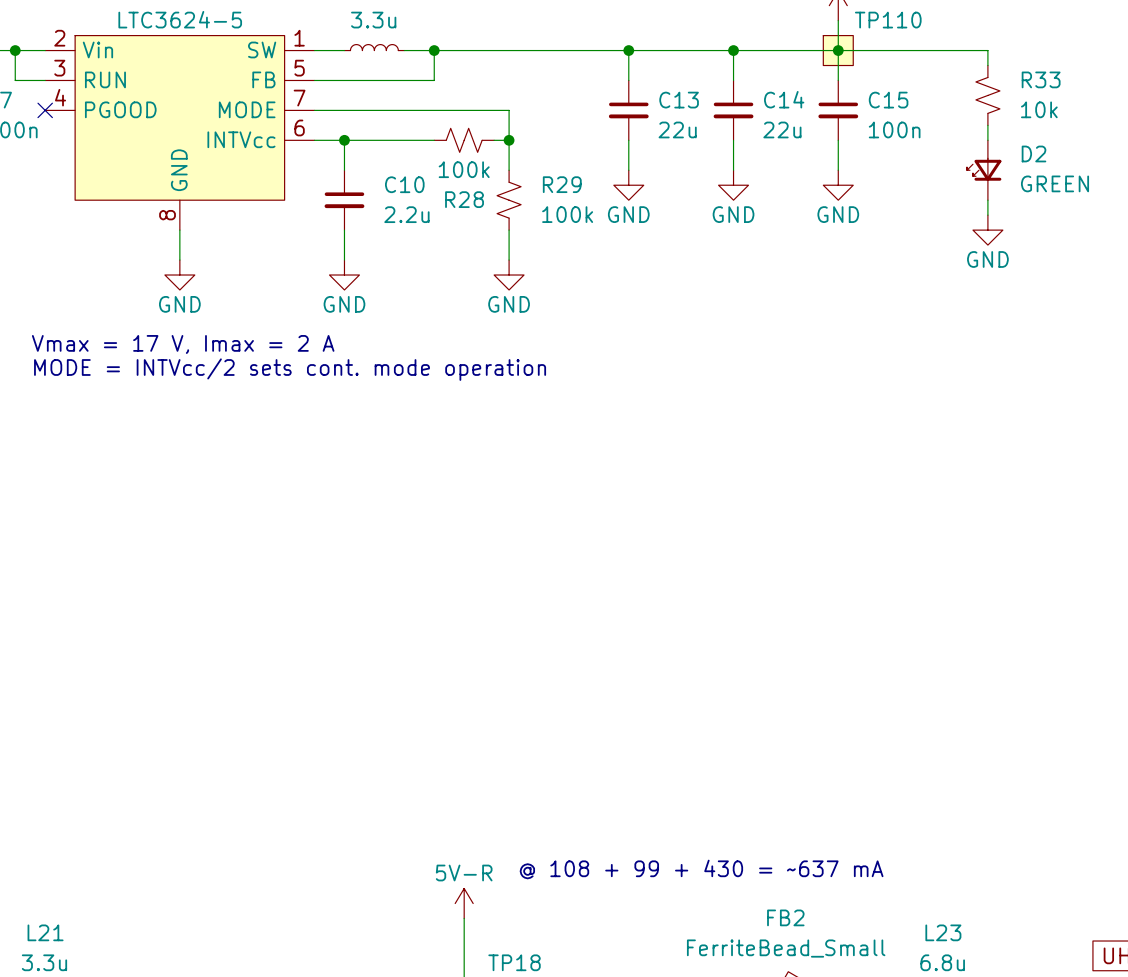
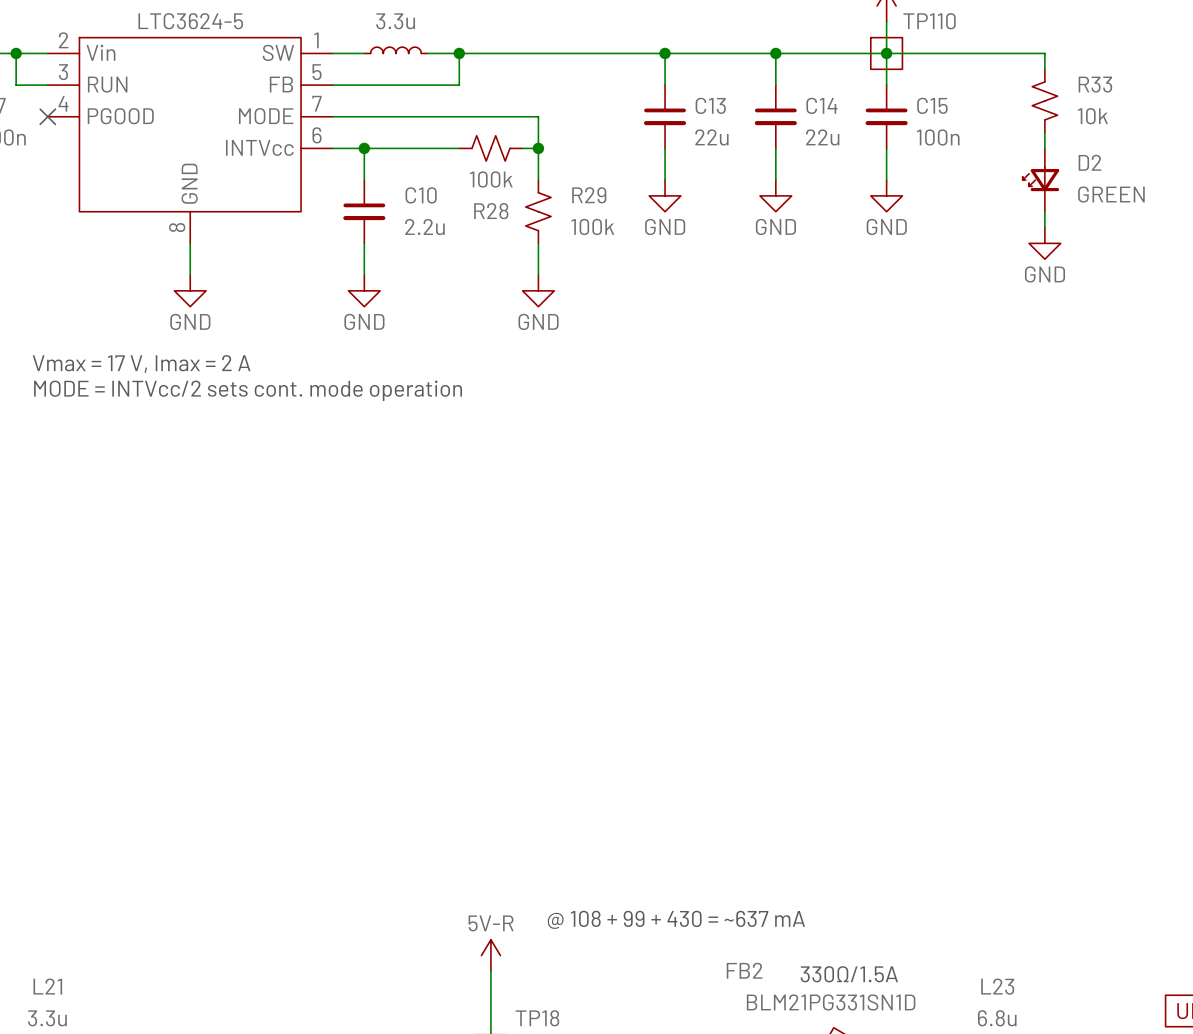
FB2 name position: FB2 (785, 917) -> FB2 (744, 970)
text: none -> 330Ω/1.5A (849, 974)
FB2 value: FerriteBead_Small (786, 948) -> BLM21PG331SN1D (831, 1002)

